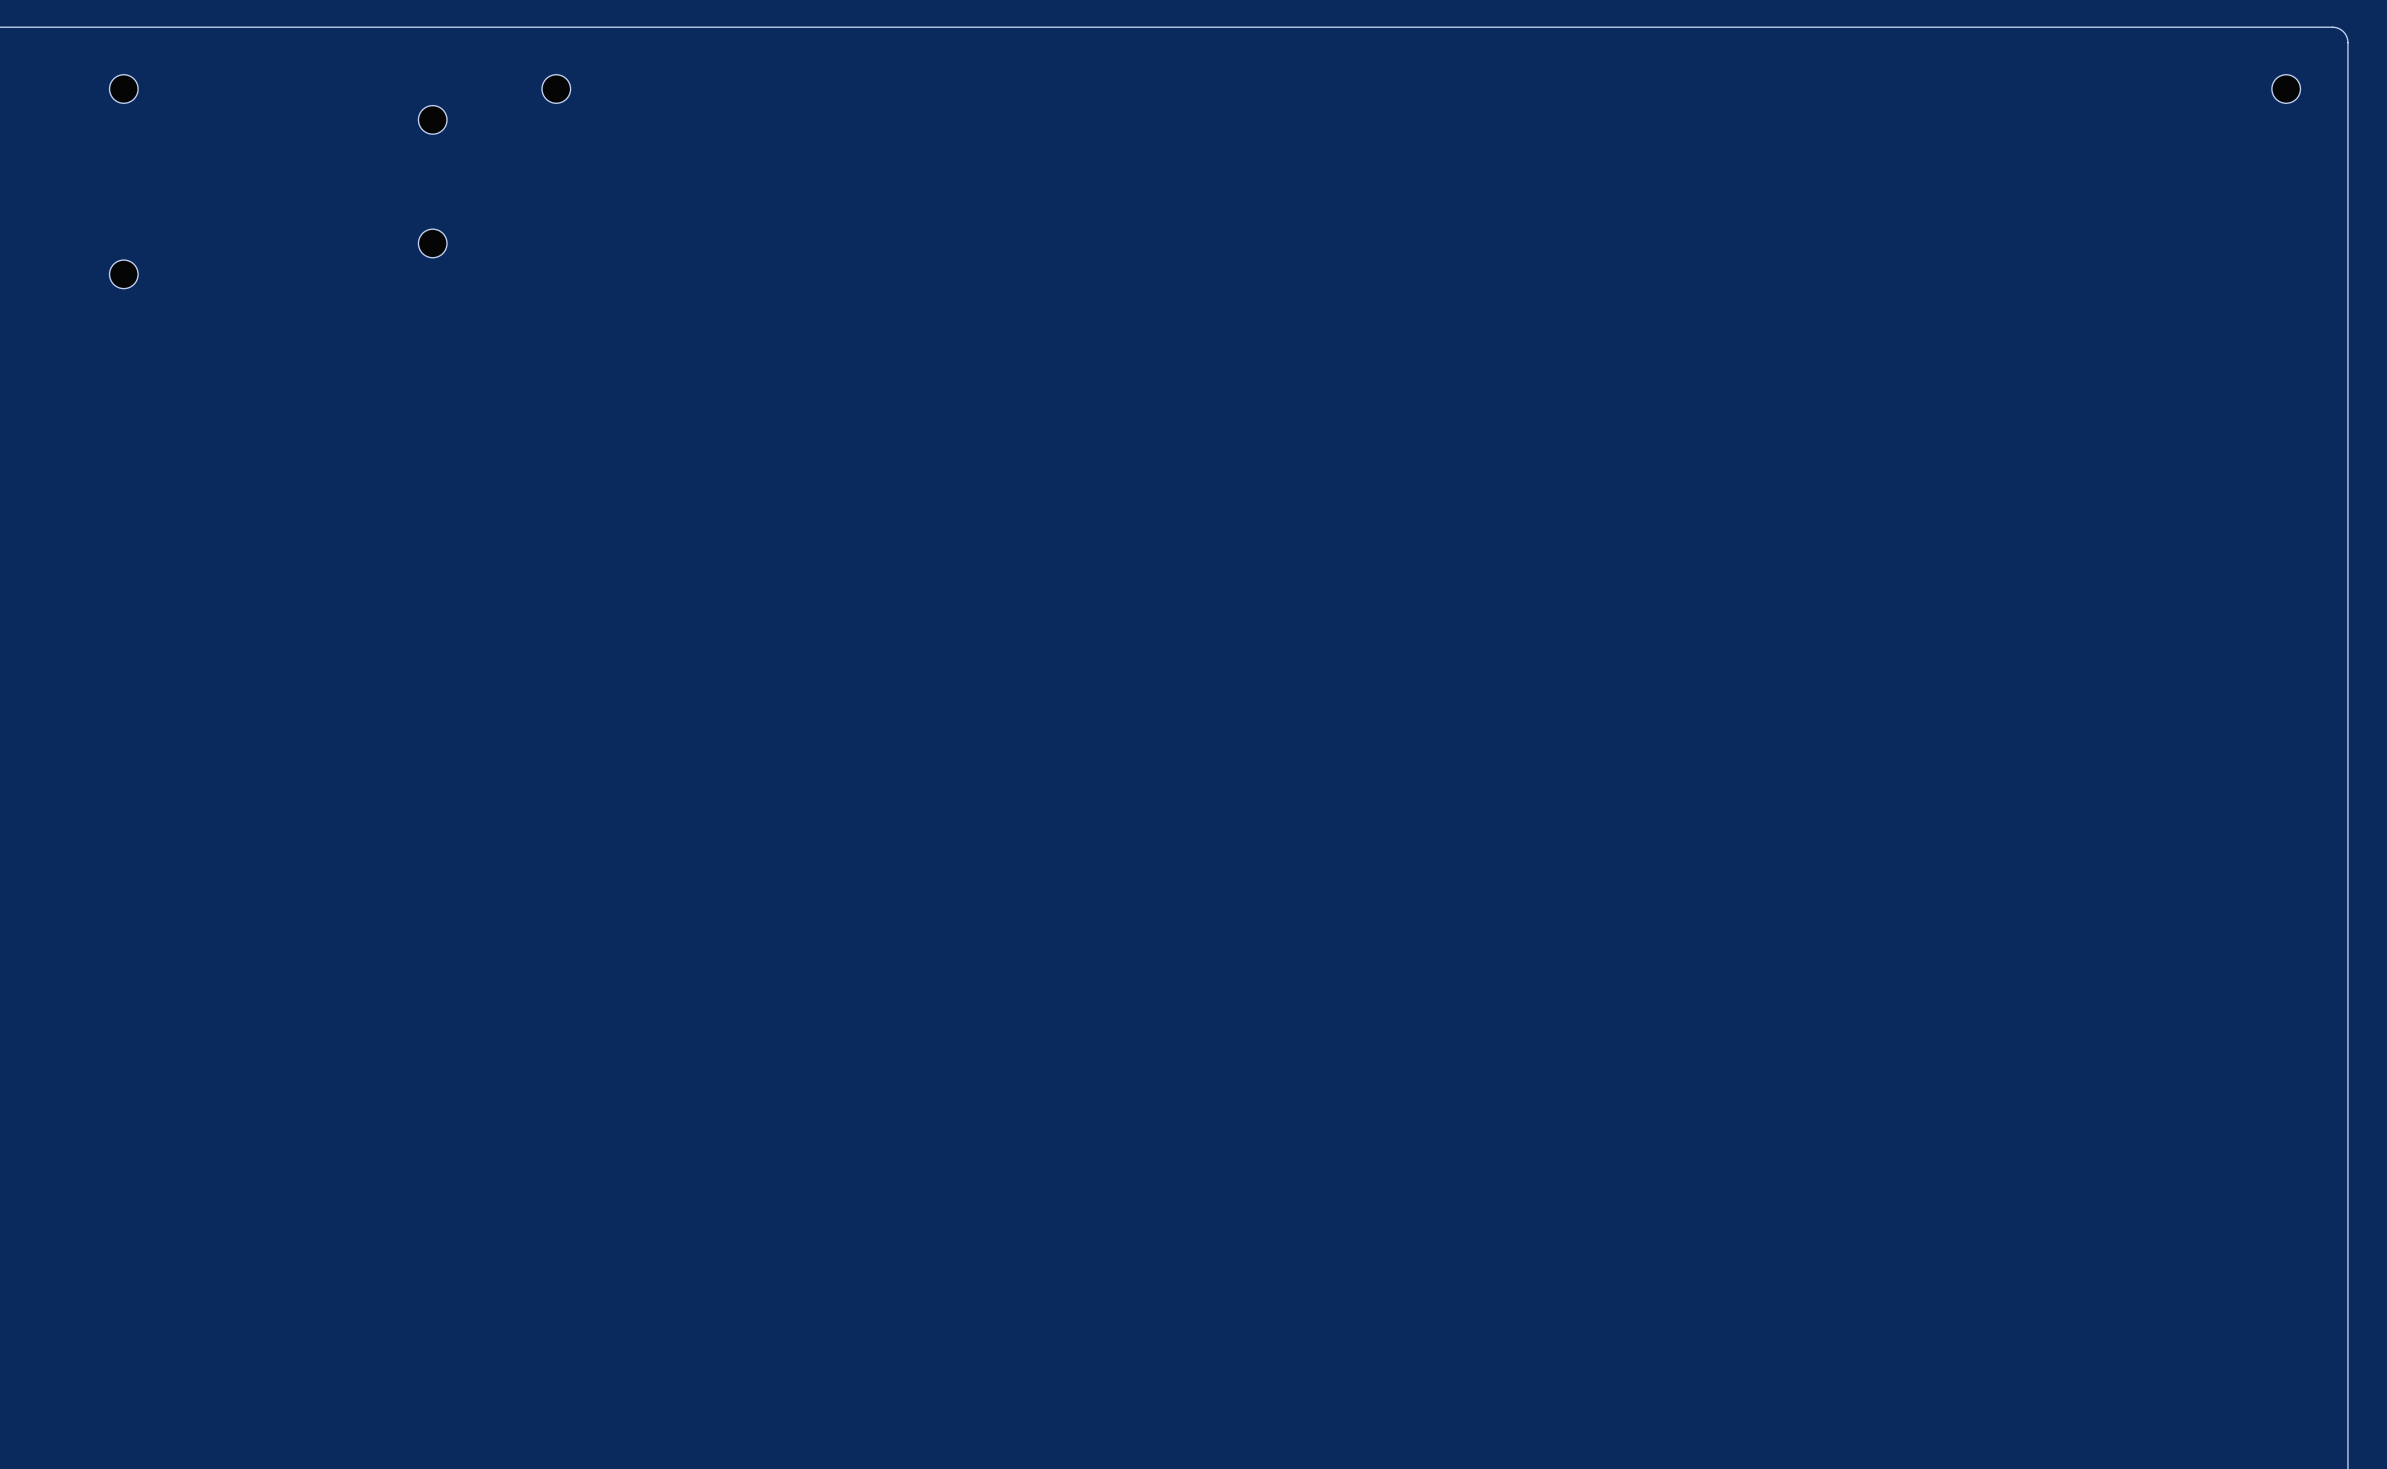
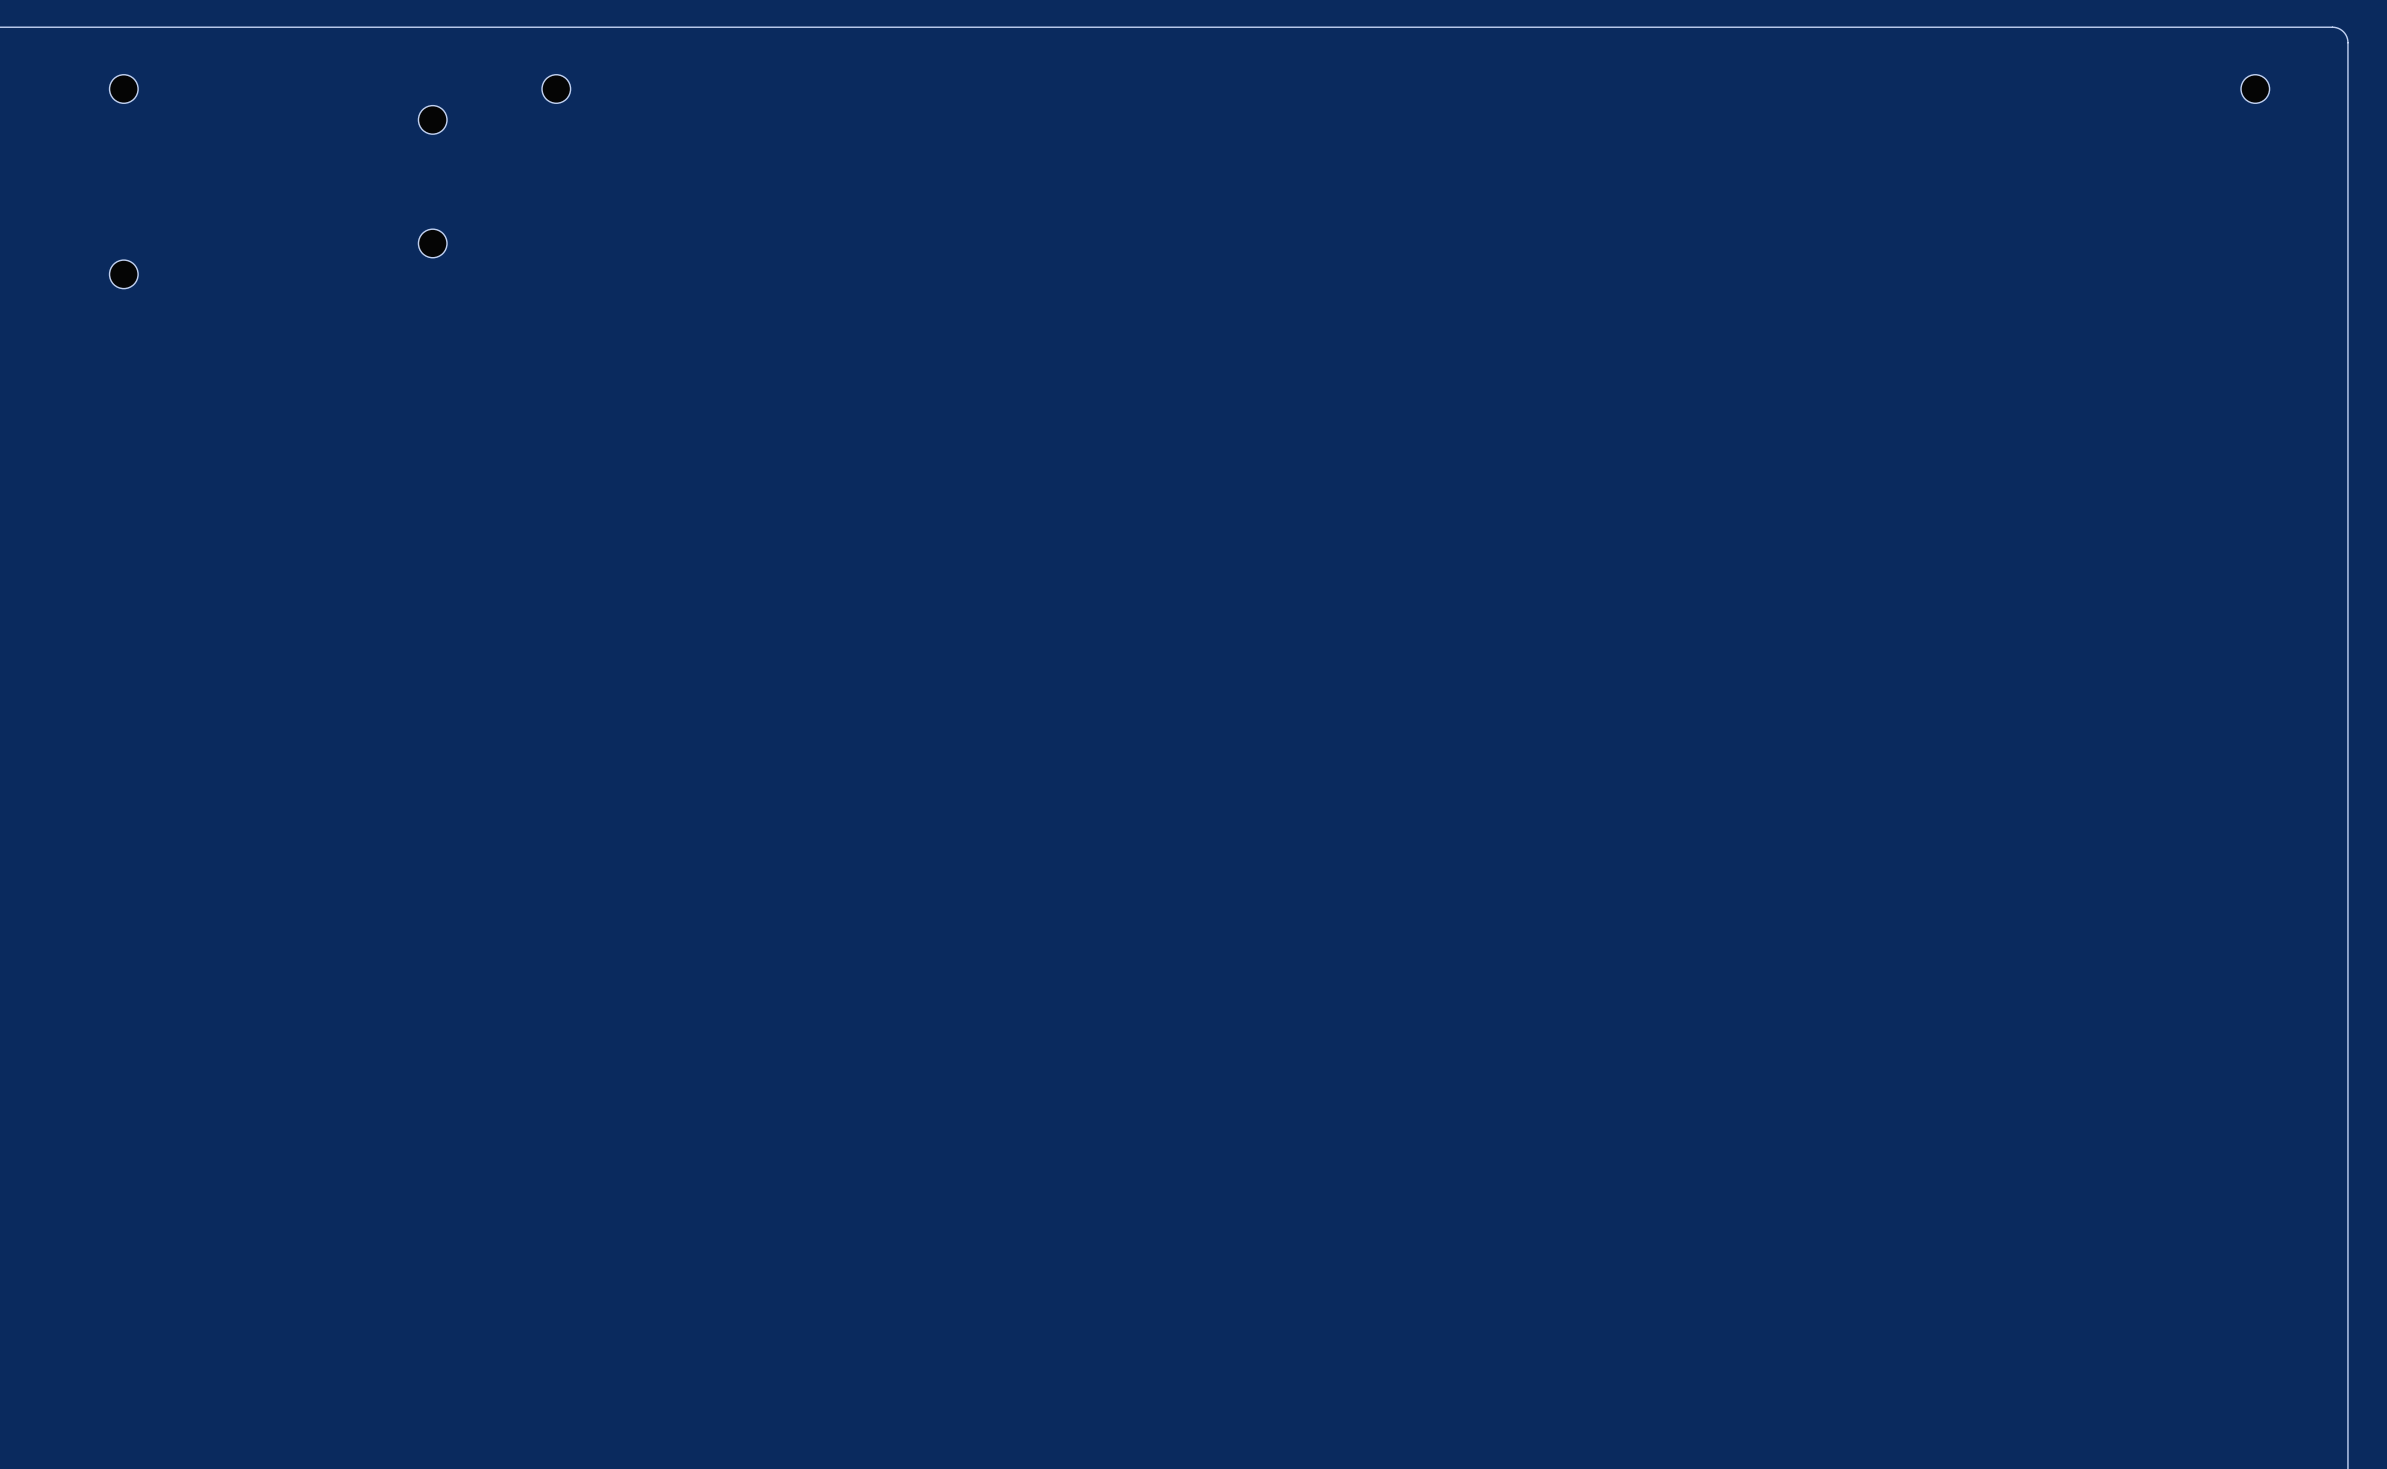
part position: (2286, 89) -> (2255, 89)

